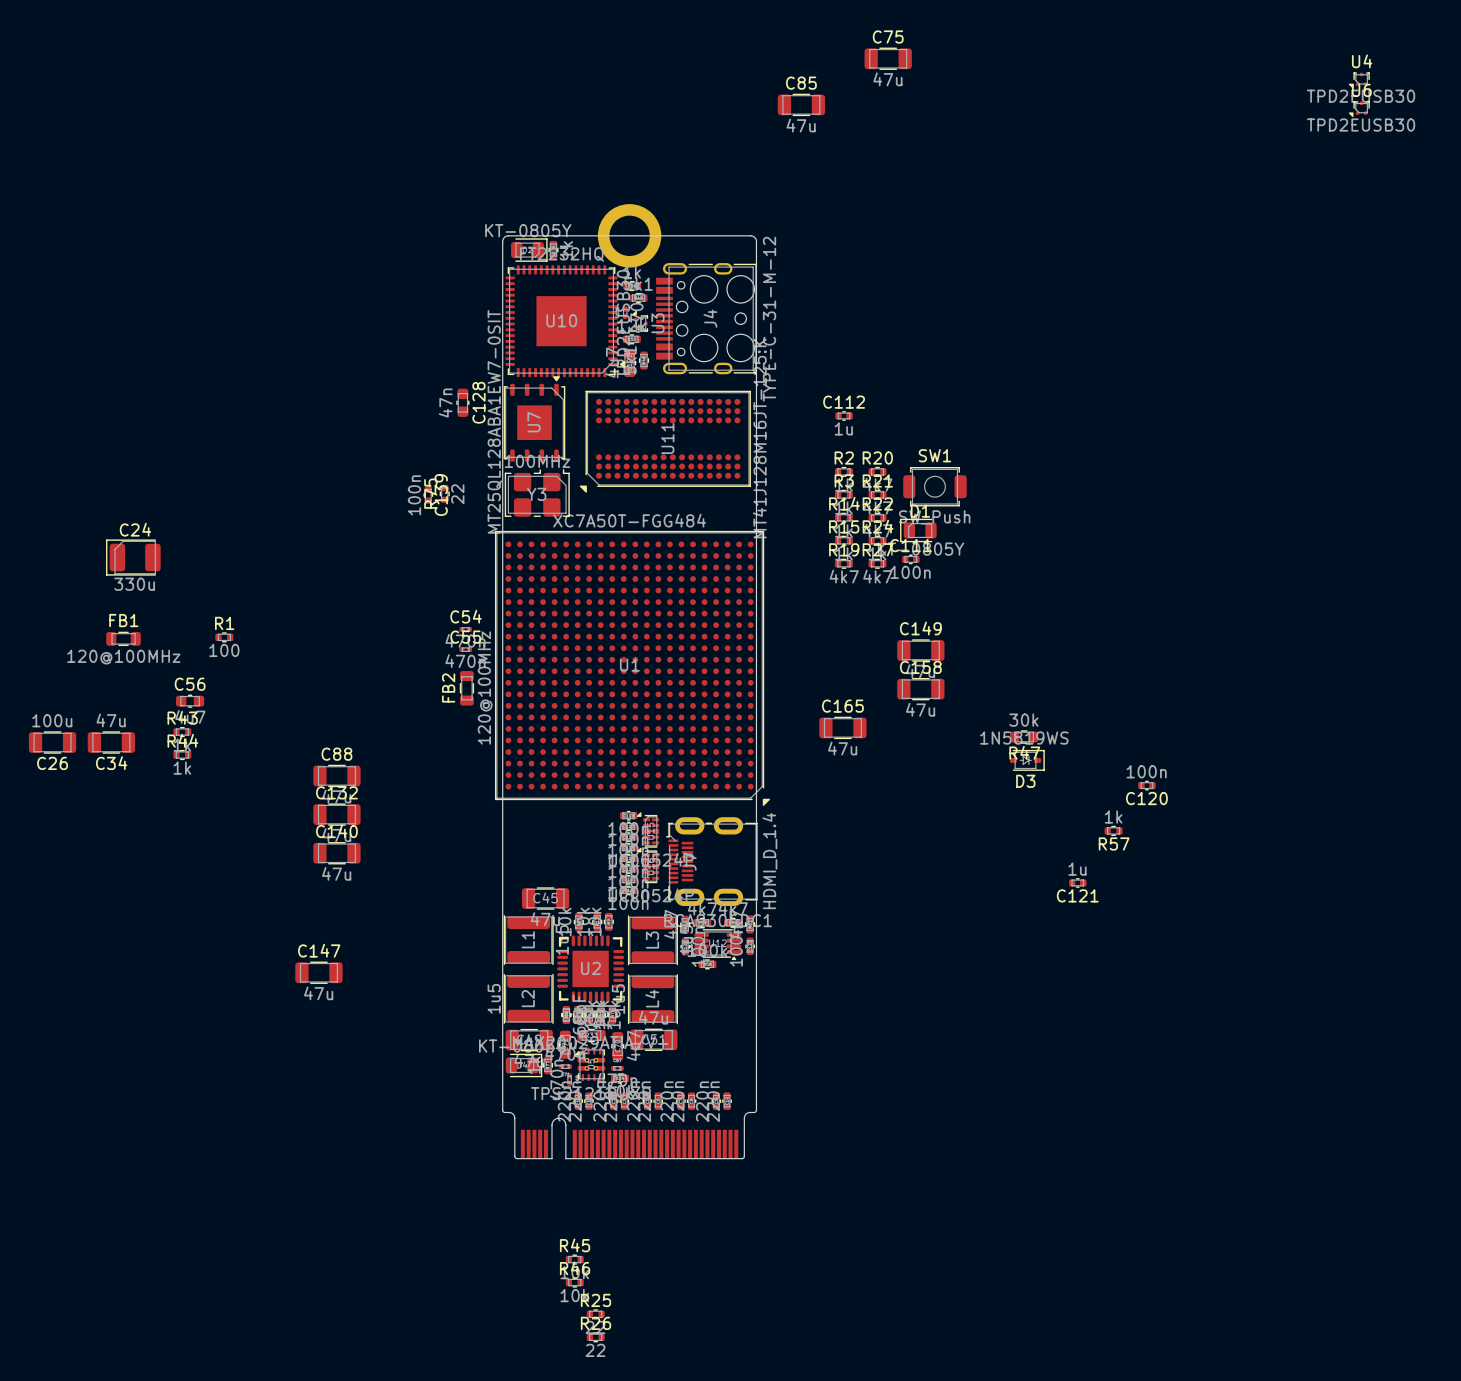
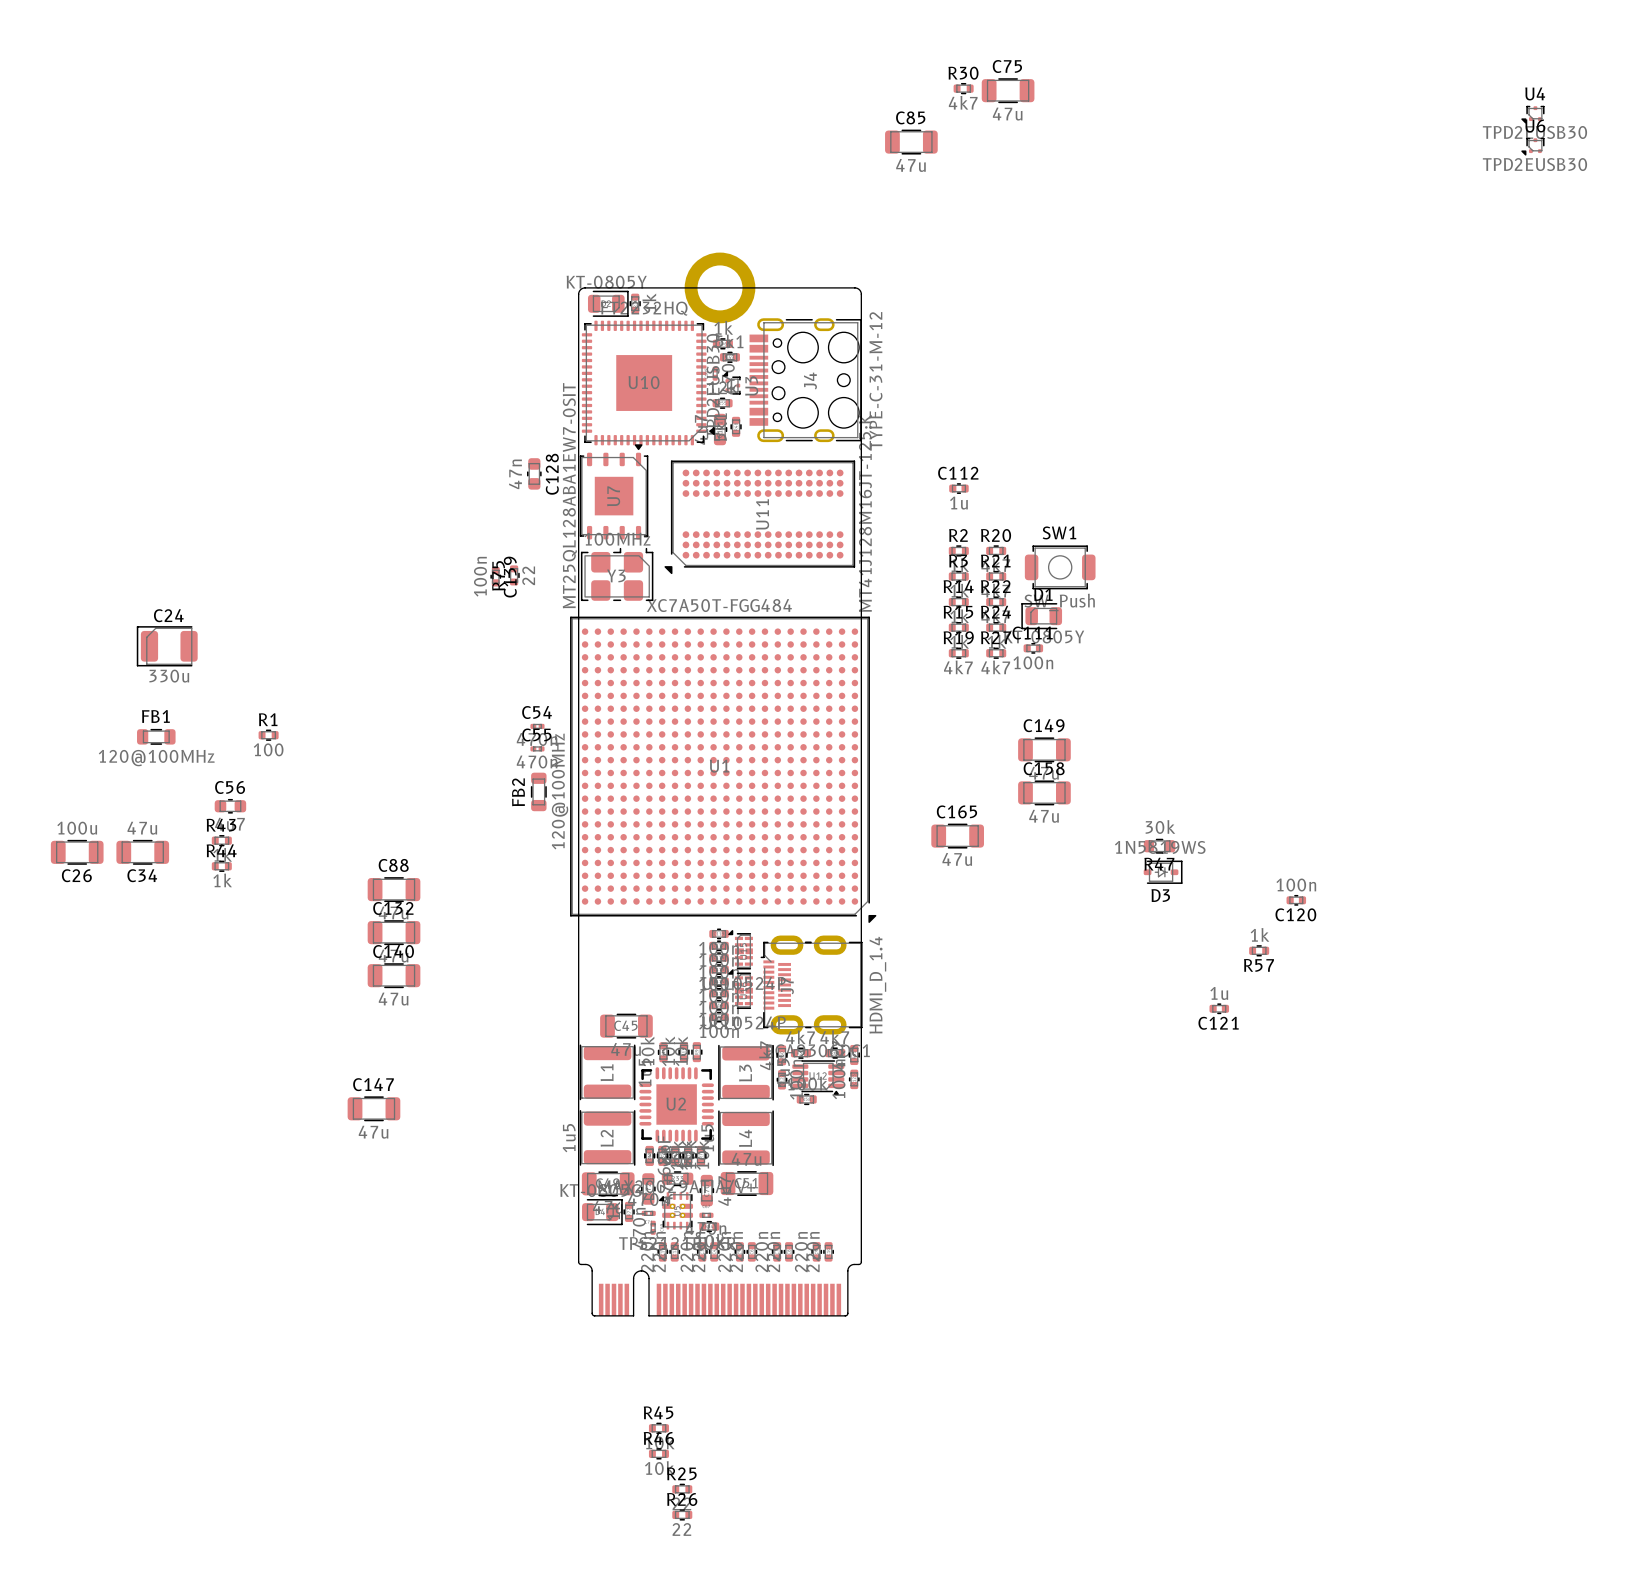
R30: none -> 4k7 (963, 88)

